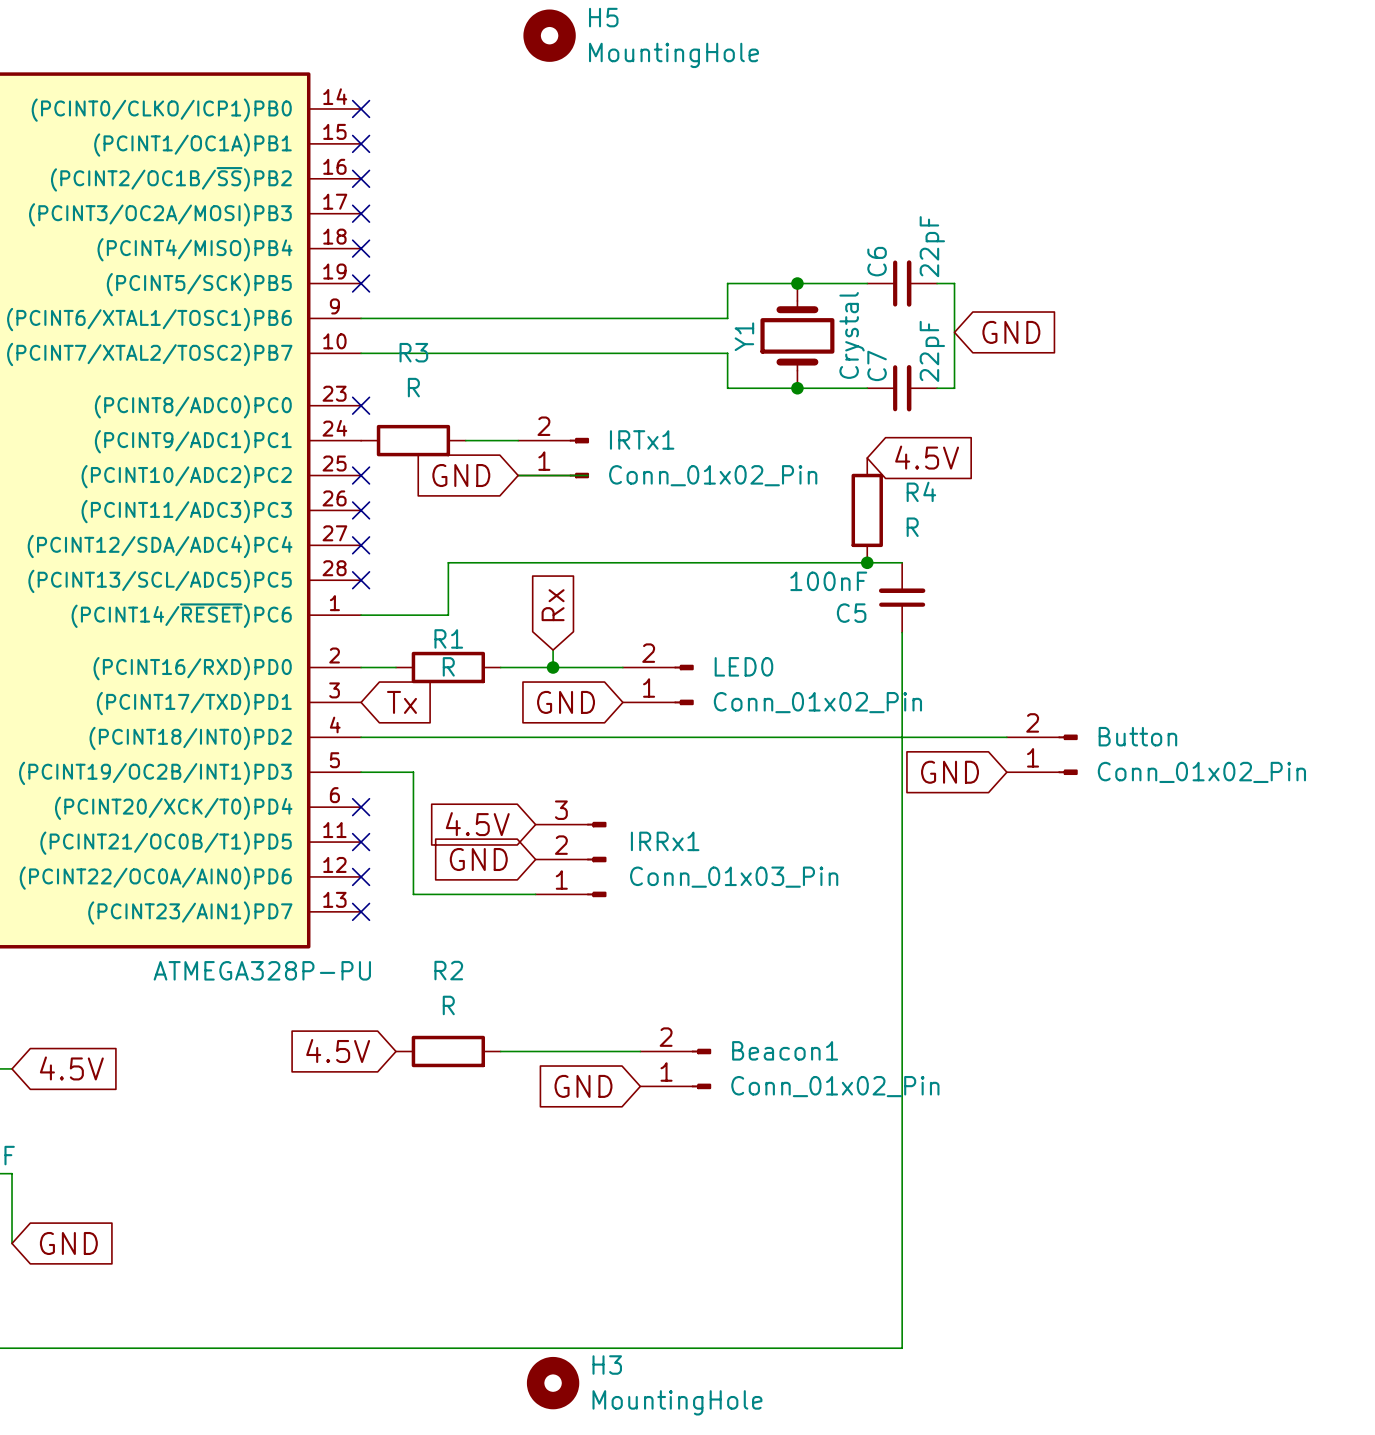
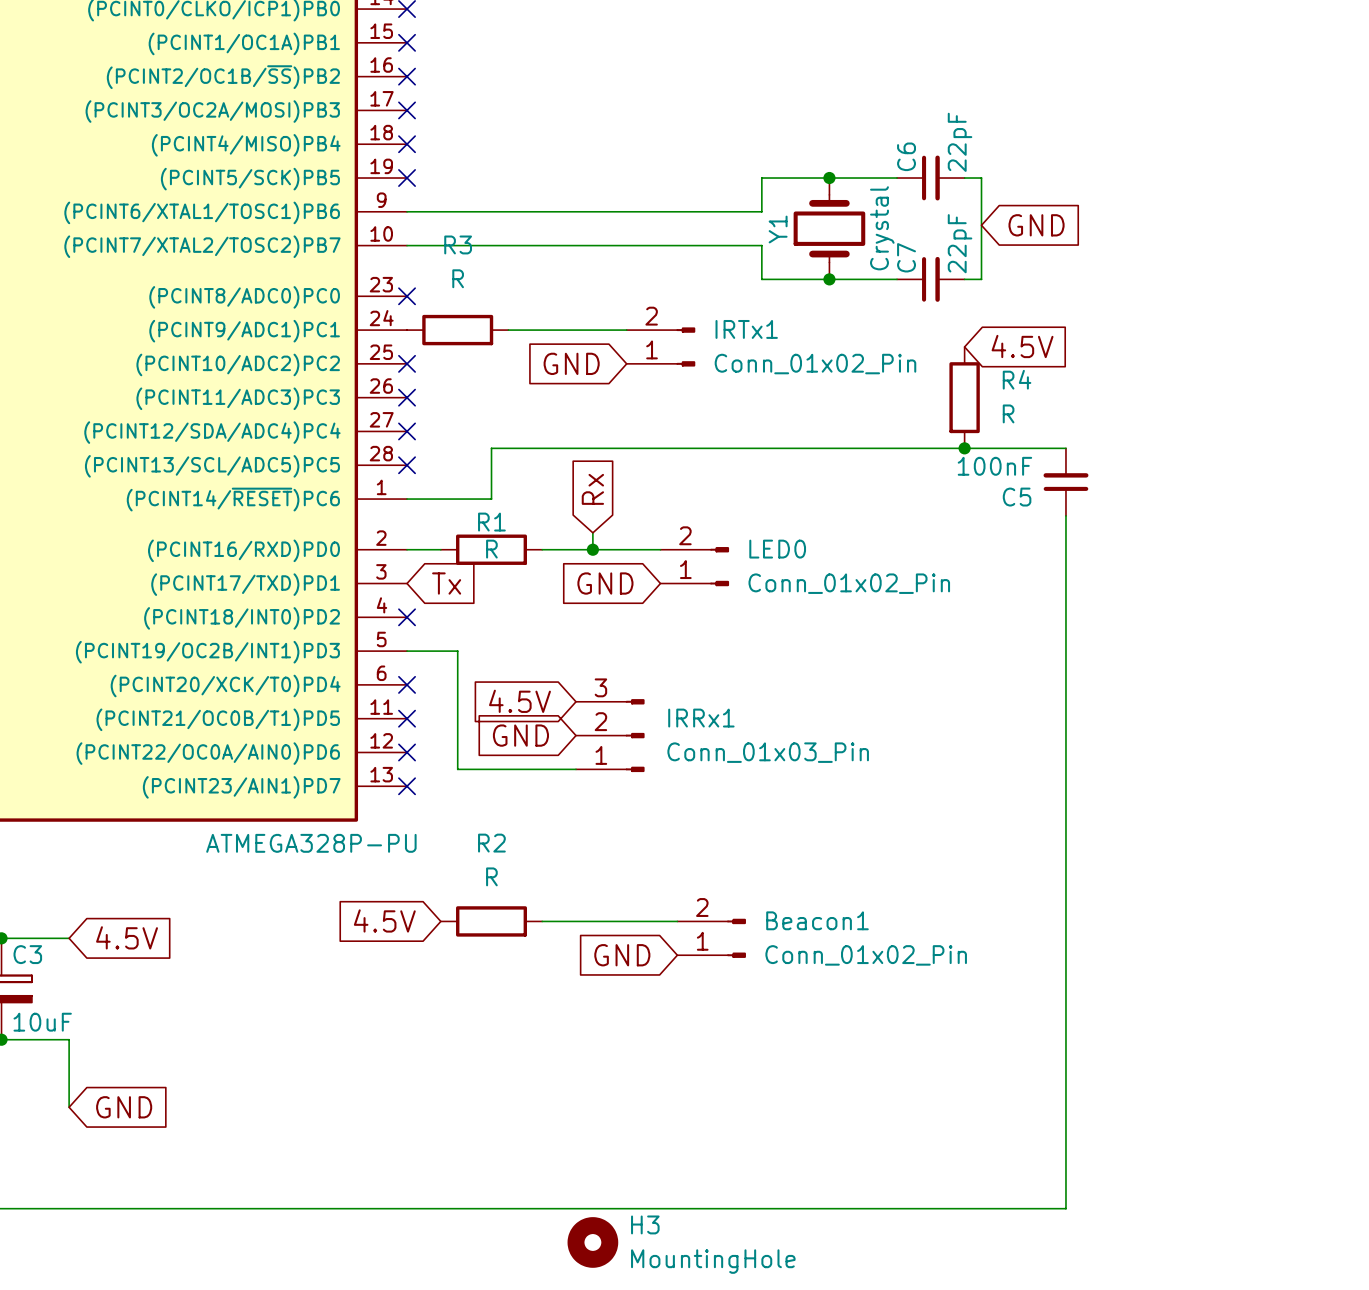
global label position: 4.5V (927, 457) -> 4.5V (1022, 346)
IRTx1 position: (553, 458) -> (660, 346)
global label position: GND (461, 475) -> GND (571, 363)
R4 position: (867, 510) -> (964, 397)
junction position: (867, 562) -> (964, 448)
wire: none -> (930, 448) (1065, 448)
C5 position: (902, 597) -> (1065, 482)
wire: (902, 632) (902, 1348) -> (1065, 515) (1065, 1208) (930, 1208)
wire: (361, 737) (1006, 737) -> none
no-connect mark: none -> (407, 617)
Button: Conn_01x02_Pin (1042, 754) -> none
global label: GND (950, 772) -> none

